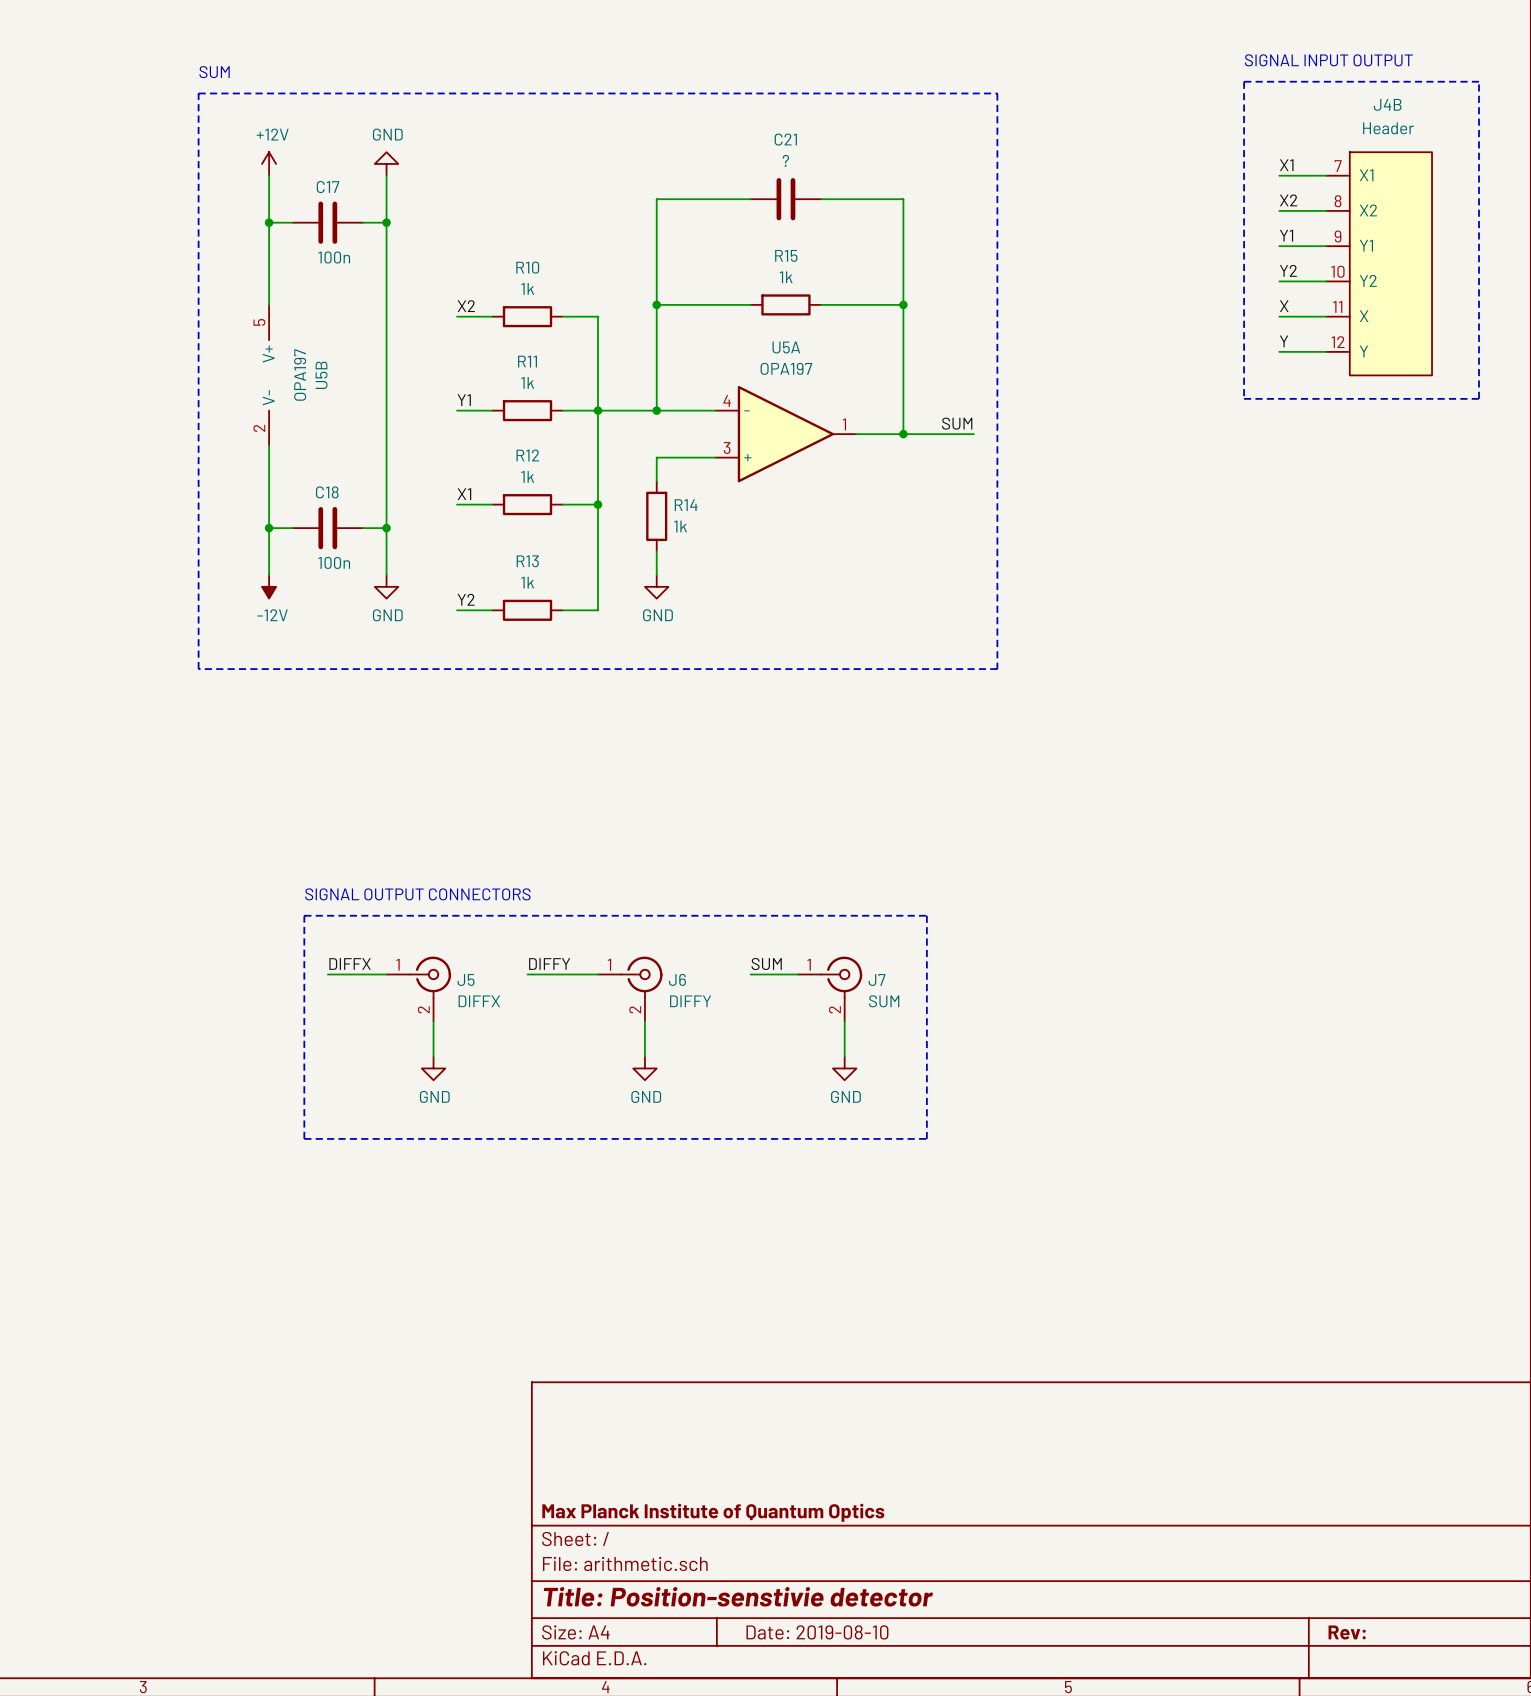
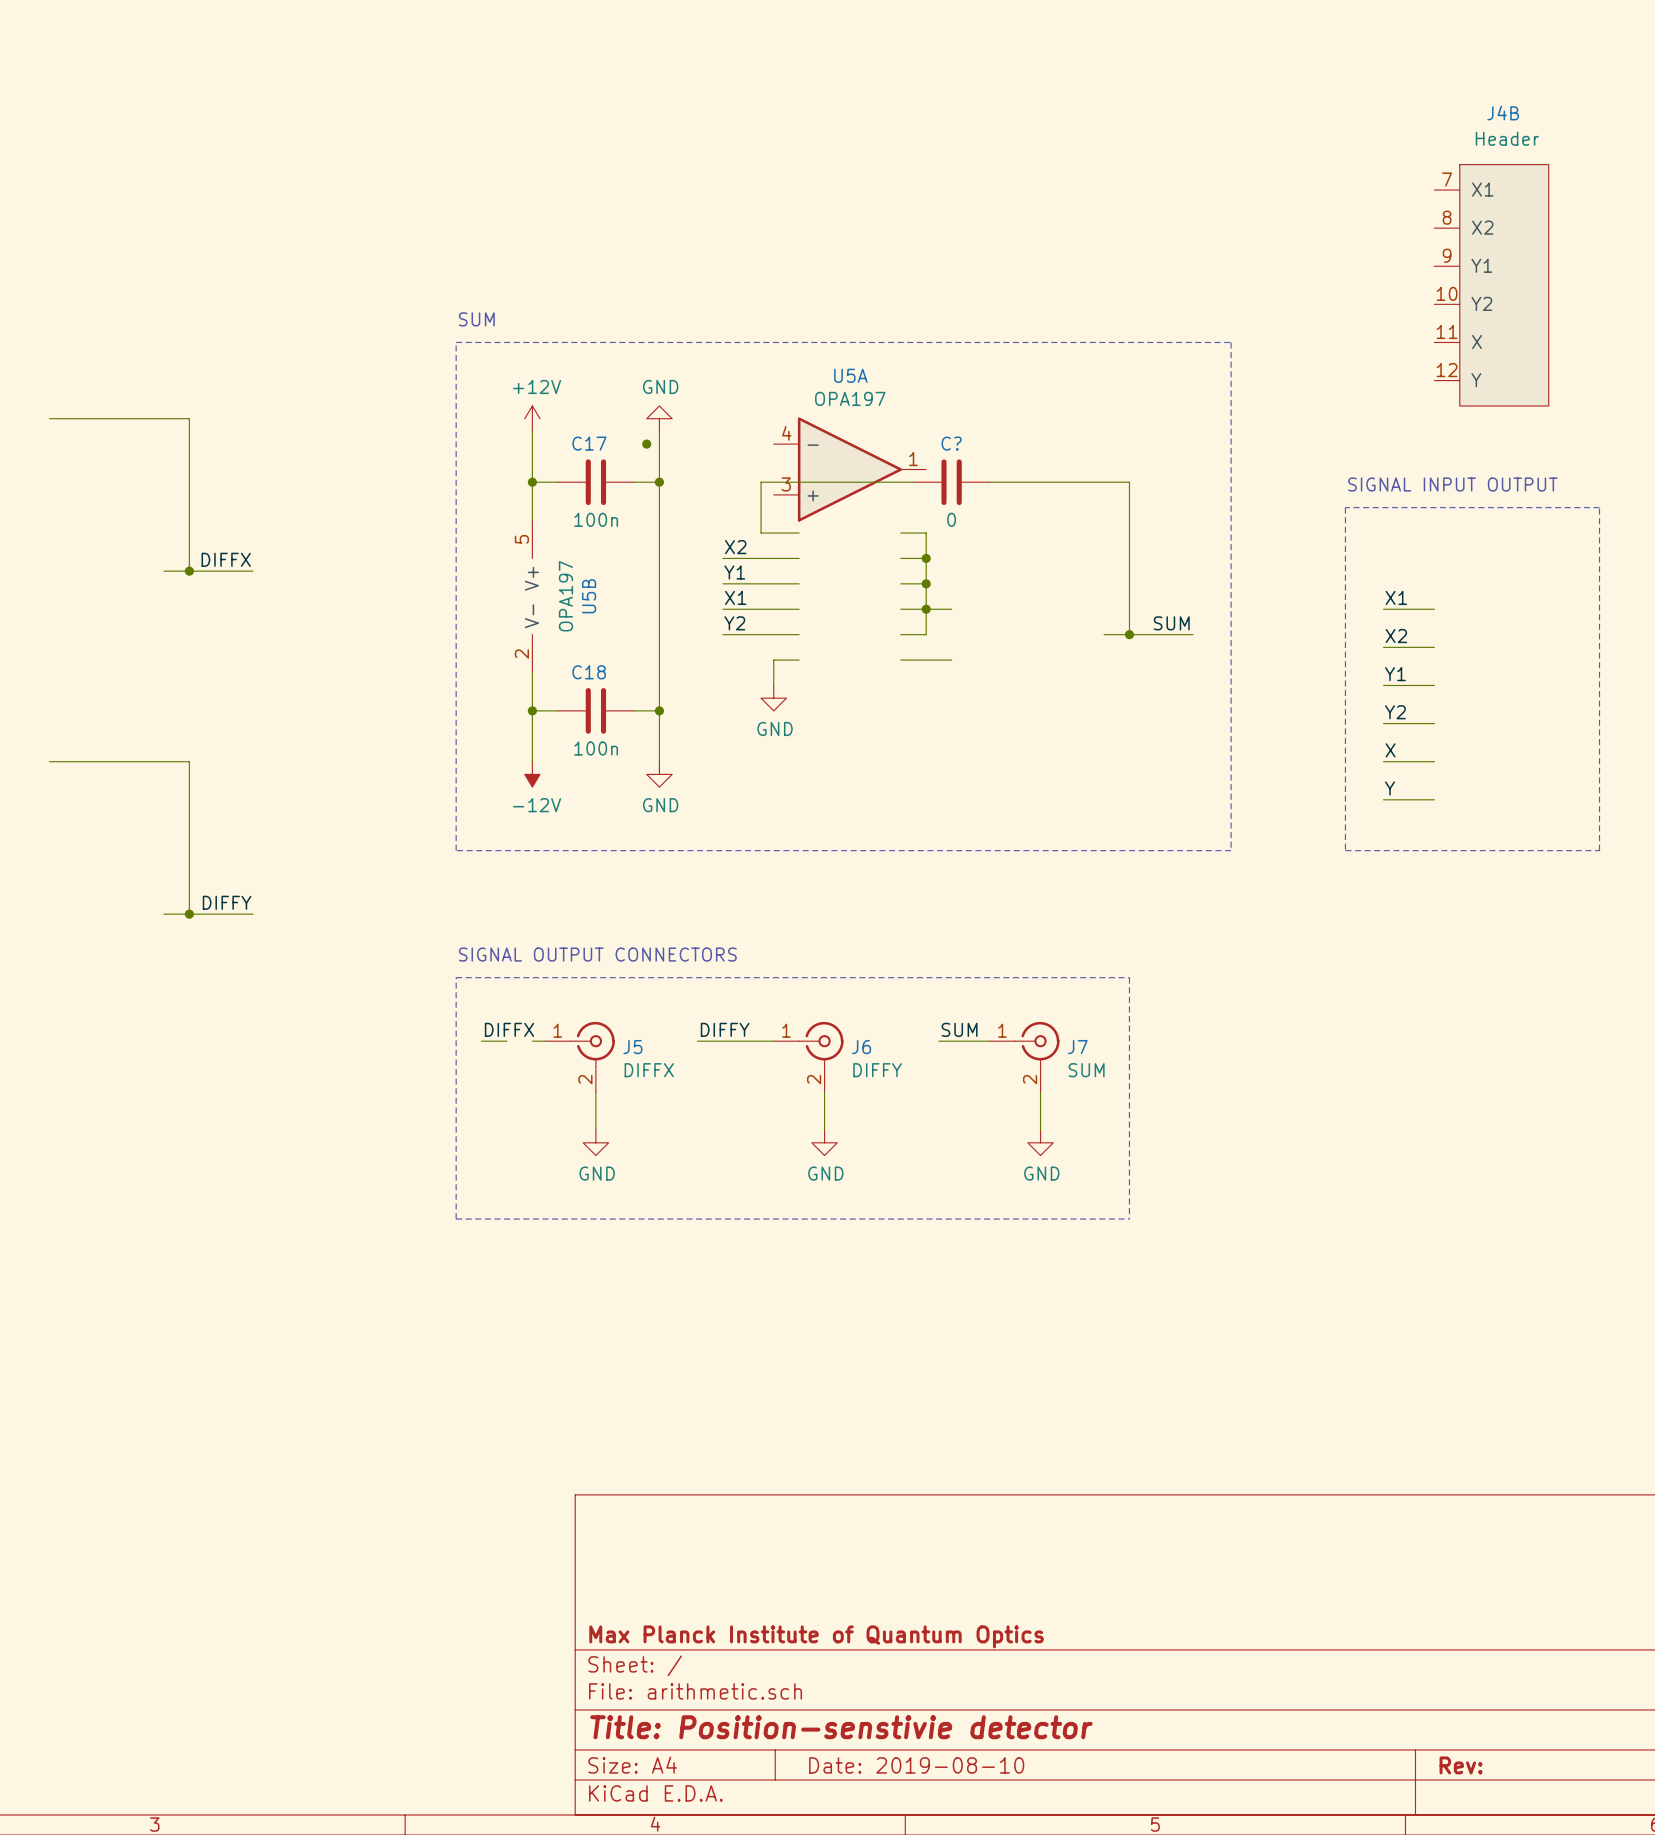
text: SIGNAL INPUT OUTPUT (1328, 60) -> none
text: SUM (214, 72) -> none
line: (1244, 81) (1479, 81) (1479, 398) (1244, 398) (1244, 81) -> none
line: (198, 93) (997, 93) (997, 669) (198, 669) (198, 93) -> none
power symbol: +12V (269, 163) -> none
power symbol: GND (386, 163) -> none
label: X1 (1286, 165) -> none
wire: (269, 175) (269, 304) -> none
wire: (386, 175) (386, 575) -> none
wire: (1279, 175) (1326, 175) -> none
wire: (750, 199) (656, 199) (656, 410) -> none
C21: ? (785, 199) -> none
wire: (821, 199) (903, 199) (903, 434) -> none
label: X2 (1288, 200) -> none
wire: (1279, 210) (1326, 210) -> none
wire: (269, 222) (292, 222) -> none
junction: (269, 222) -> none
C17 position: (327, 222) -> (595, 482)
wire: (363, 222) (386, 222) -> none
junction: (386, 222) -> none
label: Y1 (1286, 235) -> none
wire: (1279, 246) (1326, 246) -> none
label: Y2 (1288, 270) -> none
wire: (1279, 281) (1326, 281) -> none
text: none -> SUM (476, 319)
wire: (656, 304) (750, 304) -> none
junction: (656, 304) -> none
R15: 1k (785, 304) -> none
wire: (821, 304) (903, 304) -> none
junction: (903, 304) -> none
label: X2 (466, 306) -> none
label: X (1284, 306) -> none
line: none -> (456, 342) (1231, 342) (1231, 850) (456, 850) (456, 342)
R10: 1k (527, 316) -> none
wire: (562, 316) (597, 316) (597, 610) (562, 610) -> none
wire: (1279, 316) (1326, 316) -> none
label: Y (1284, 341) -> none
wire: (1279, 351) (1326, 351) -> (1383, 609) (1434, 609)
U5B position: (269, 375) -> (532, 596)
wire: none -> (49, 418) (189, 418) (189, 571)
power symbol: none -> +12V (532, 418)
power symbol: none -> GND (659, 418)
wire: none -> (532, 431) (532, 520)
wire: none -> (659, 431) (659, 761)
label: Y1 (464, 400) -> none
wire: (457, 410) (492, 410) -> none
R11: 1k (527, 410) -> none
wire: (562, 410) (715, 410) -> none
junction: (656, 410) -> none
label position: SUM (957, 423) -> SUM (1171, 623)
wire: (856, 434) (973, 434) -> none
junction: (903, 434) -> none
wire: (269, 445) (269, 575) -> none
junction: none -> (532, 482)
wire: none -> (634, 482) (659, 482)
junction: none -> (659, 482)
wire: none -> (913, 482) (761, 482) (761, 533) (799, 533)
C?: none -> 0 (951, 482)
wire: none -> (989, 482) (1129, 482) (1129, 634)
text: none -> SIGNAL INPUT OUTPUT (1452, 484)
wire: (715, 457) (656, 457) (656, 481) -> none
line: none -> (1345, 507) (1599, 507) (1599, 850) (1345, 850) (1345, 507)
wire: none -> (900, 533) (926, 533) (926, 634) (900, 634)
label position: X1 (464, 494) -> X1 (735, 597)
wire: (457, 504) (492, 504) -> none
R12: 1k (527, 504) -> none
wire: (562, 504) (597, 504) -> none
junction: (597, 504) -> none
label: none -> X2 (735, 547)
R14: 1k (656, 516) -> none
wire: none -> (722, 558) (799, 558)
wire: none -> (900, 558) (926, 558)
junction: none -> (926, 558)
label: none -> DIFFX (226, 559)
wire: none -> (163, 571) (252, 571)
junction: none -> (189, 571)
wire: (269, 528) (292, 528) -> none
junction: (269, 528) -> none
C18 position: (327, 528) -> (595, 710)
wire: (363, 528) (386, 528) -> (532, 482) (557, 482)
junction: (386, 528) -> none
label: none -> Y1 (734, 572)
wire: none -> (722, 583) (799, 583)
wire: none -> (900, 583) (926, 583)
junction: none -> (926, 583)
wire: (656, 551) (656, 575) -> none
label: none -> X1 (1396, 597)
wire: none -> (722, 609) (799, 609)
wire: none -> (900, 609) (951, 609)
junction: none -> (926, 609)
power symbol: -12V (269, 586) -> none
power symbol: GND (386, 586) -> none
power symbol: GND (656, 586) -> none
wire: none -> (722, 634) (799, 634)
wire: none -> (1104, 634) (1192, 634)
junction: none -> (1129, 634)
label: none -> X2 (1396, 636)
wire: none -> (1383, 647) (1434, 647)
label position: Y2 (466, 599) -> Y2 (734, 623)
wire: (457, 610) (492, 610) -> none
R13: 1k (527, 610) -> none
wire: none -> (799, 660) (773, 660) (773, 685)
wire: none -> (900, 660) (951, 660)
wire: none -> (532, 672) (532, 761)
label: none -> Y1 (1395, 674)
wire: none -> (1383, 685) (1434, 685)
power symbol: none -> GND (773, 698)
wire: none -> (532, 710) (557, 710)
junction: none -> (532, 710)
wire: none -> (634, 710) (659, 710)
junction: none -> (659, 710)
label: none -> Y2 (1395, 712)
wire: none -> (1383, 723) (1434, 723)
label: none -> X (1390, 750)
wire: none -> (49, 761) (189, 761) (189, 914)
wire: none -> (1383, 761) (1434, 761)
power symbol: none -> -12V (532, 774)
power symbol: none -> GND (659, 774)
label: none -> Y (1389, 788)
wire: none -> (1383, 799) (1434, 799)
label: none -> DIFFY (227, 902)
wire: none -> (163, 914) (252, 914)
junction: none -> (189, 914)
text position: SIGNAL OUTPUT CONNECTORS (417, 894) -> SIGNAL OUTPUT CONNECTORS (597, 954)
line: (304, 915) (304, 1138) (926, 1138) (926, 915) (304, 915) -> (456, 977) (456, 1219) (1129, 1219) (1129, 977) (456, 977)
wire: none -> (481, 1041) (506, 1041)
wire: none -> (532, 1041) (545, 1041)
label position: DIFFX (350, 964) -> DIFFX (509, 1029)
label position: DIFFY (549, 964) -> DIFFY (725, 1029)
label position: SUM (766, 964) -> SUM (959, 1029)
wire: (327, 974) (386, 974) -> none
wire: (527, 974) (597, 974) -> (697, 1041) (773, 1041)
wire: (750, 974) (797, 974) -> (938, 1041) (989, 1041)
J5 position: (418, 989) -> (580, 1056)
J6 position: (630, 989) -> (808, 1056)
J7 position: (829, 989) -> (1024, 1056)
wire: (433, 1021) (433, 1056) -> (595, 1092) (595, 1130)
wire: (644, 1021) (644, 1056) -> (824, 1092) (824, 1130)
wire: (844, 1021) (844, 1056) -> (1040, 1092) (1040, 1130)
power symbol: none -> GND (595, 1142)
power symbol: none -> GND (824, 1142)
power symbol: none -> GND (1040, 1142)
power symbol: GND (433, 1068) -> none
power symbol: GND (644, 1068) -> none
power symbol: GND (844, 1068) -> none

